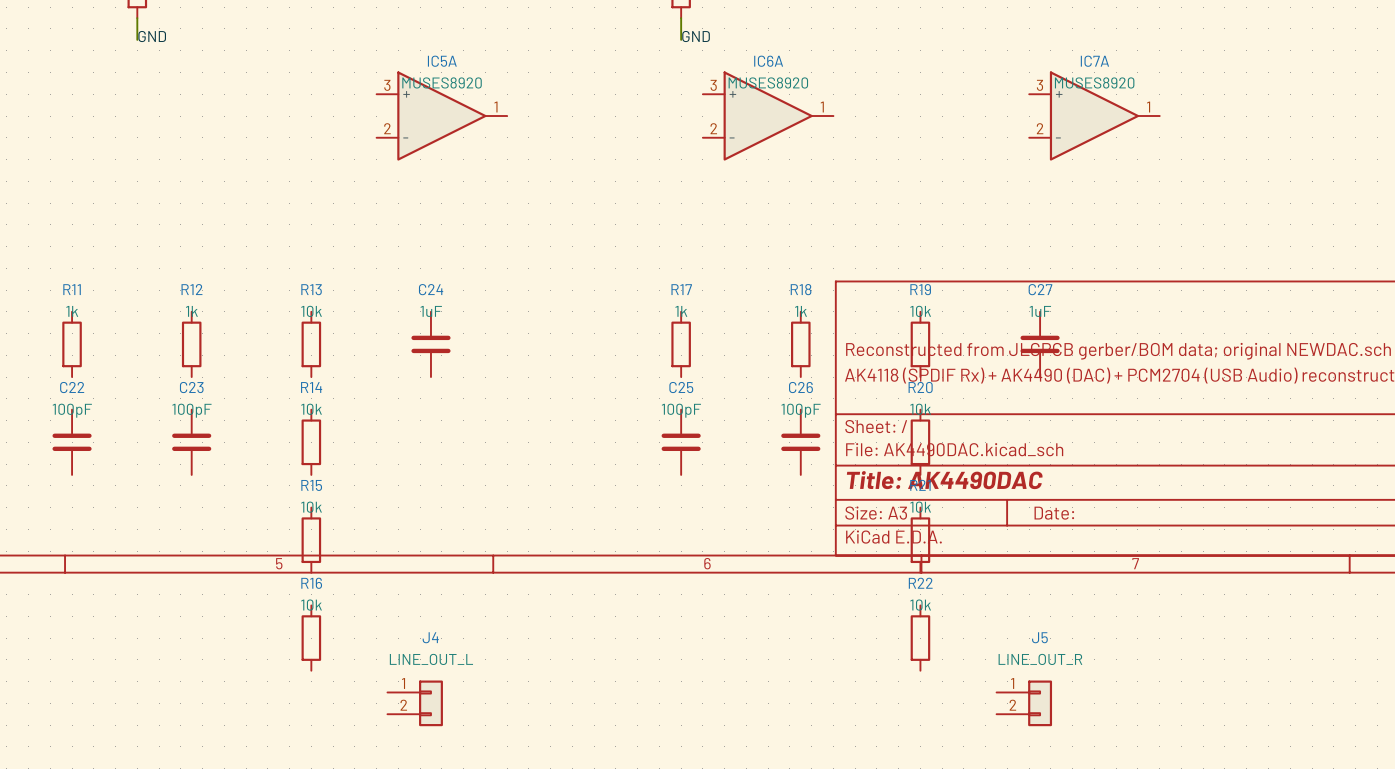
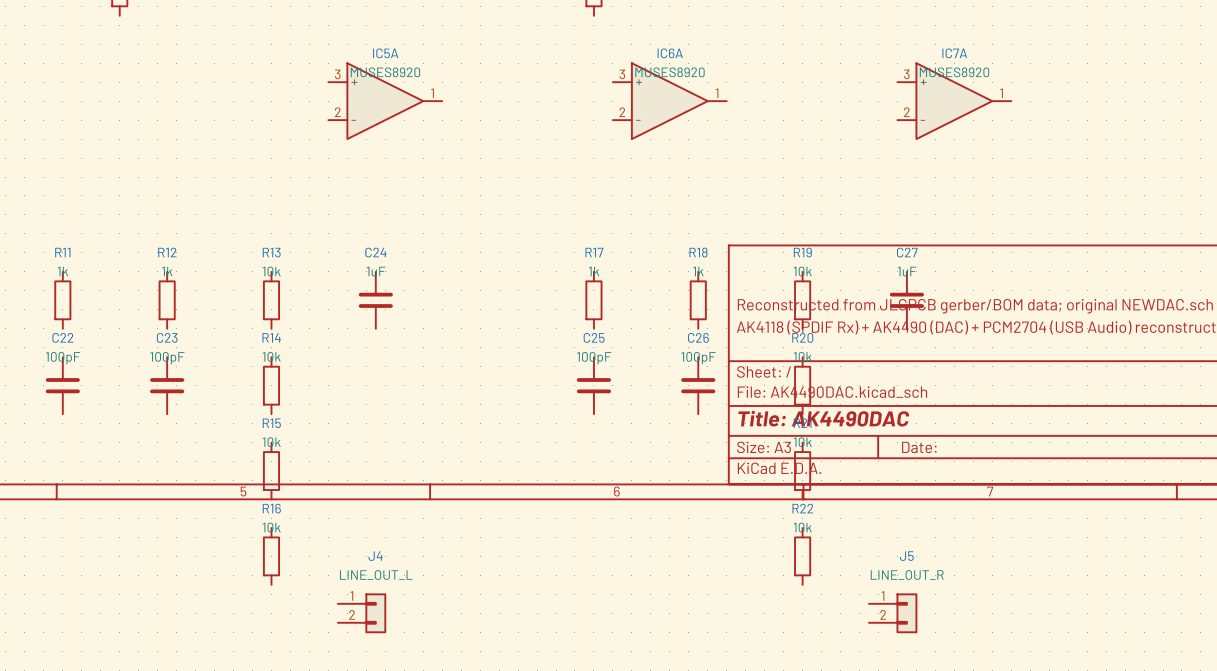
wire: (137, 18) (137, 39) -> none
wire: (681, 18) (681, 39) -> none
label: GND (152, 36) -> none
label: GND (696, 36) -> none

